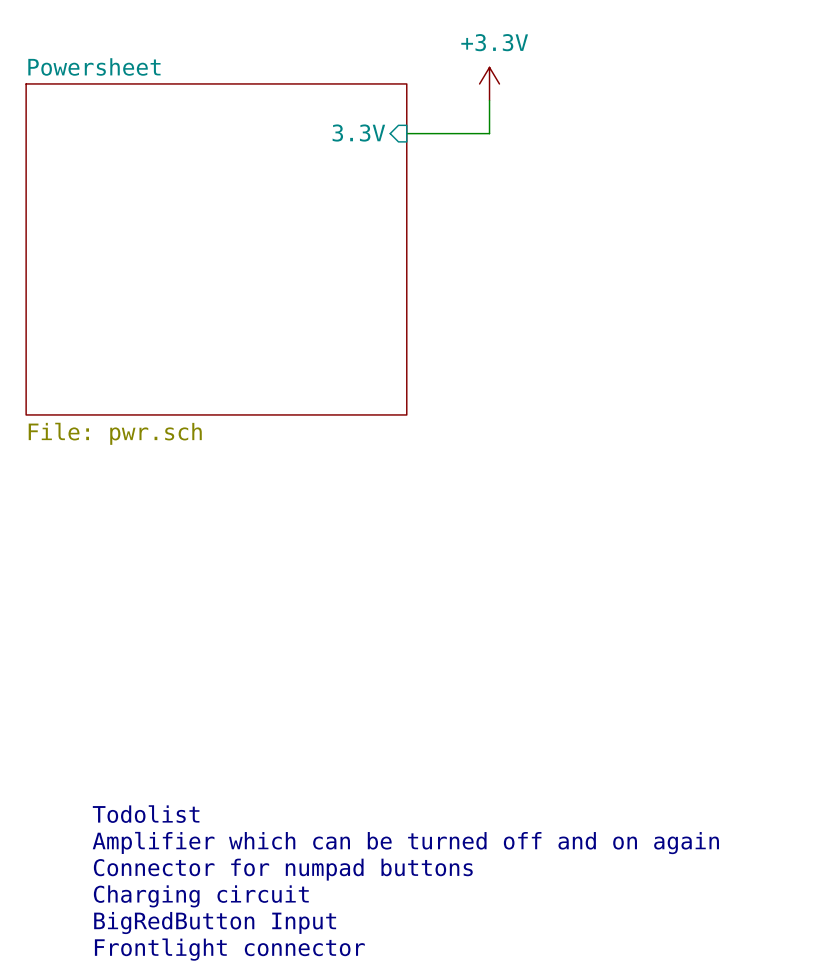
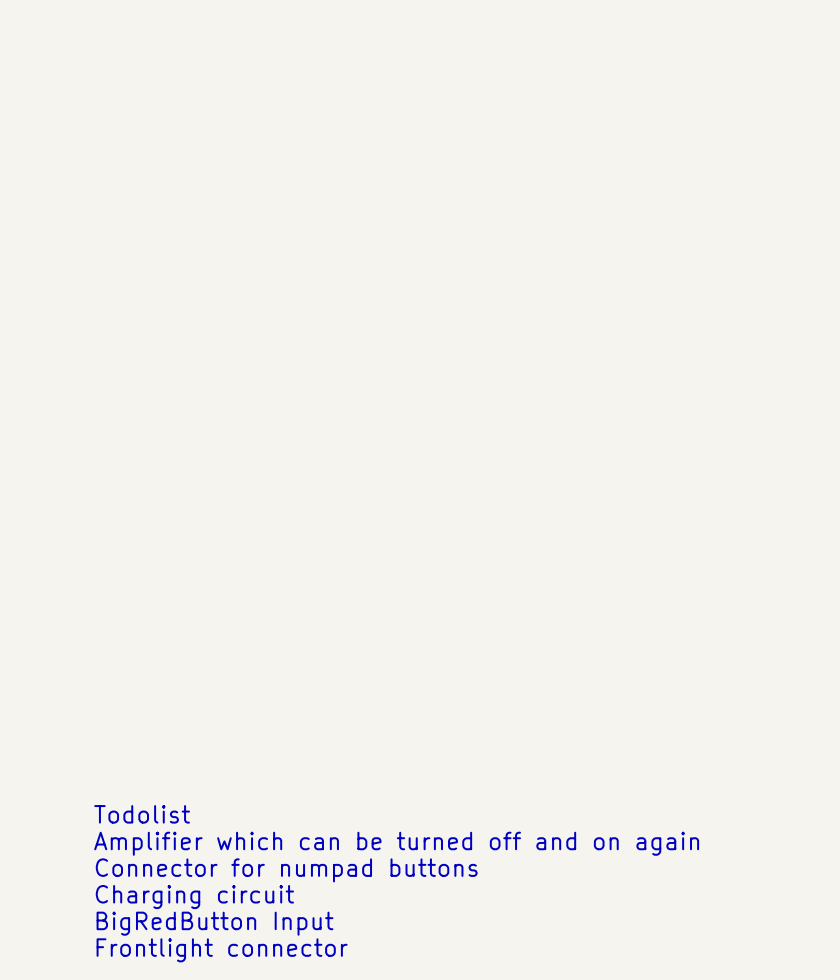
power symbol: +3.3V (489, 83) -> none
wire: (489, 100) (489, 133) (406, 133) -> none
sheet pin: 3.3V (358, 133) -> none
sheet Powersheet: File: pwr.sch (216, 249) -> none

